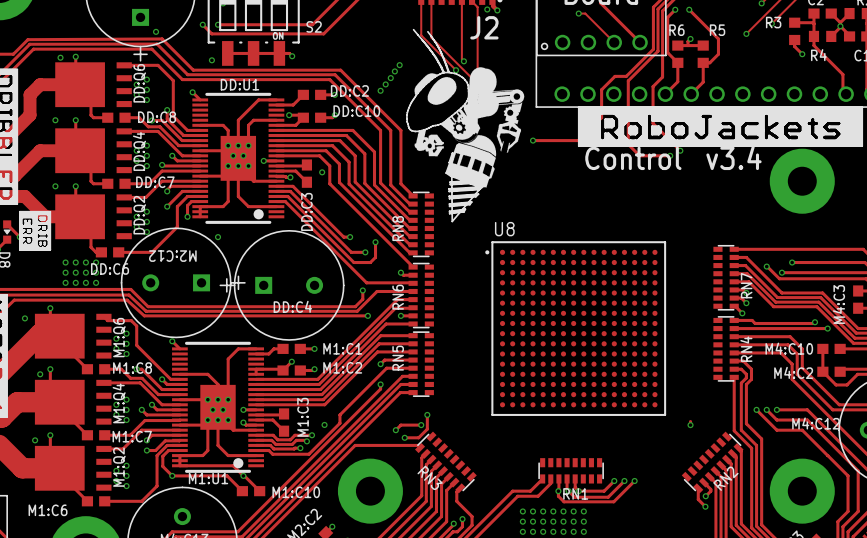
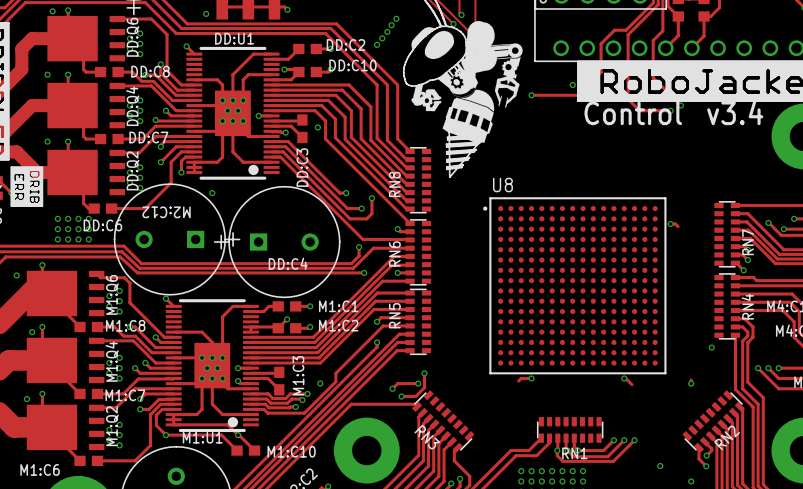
via: none -> (572, 84)
track: none -> (670, 224) (675, 224) (678, 226)
via: none -> (670, 224)
via: none -> (711, 347)
track: none -> (531, 378) (521, 378) (518, 381)
via: none -> (531, 378)
track: none -> (624, 378) (631, 384)
via: none -> (624, 378)
via: none -> (660, 466)
via: none -> (691, 481)

